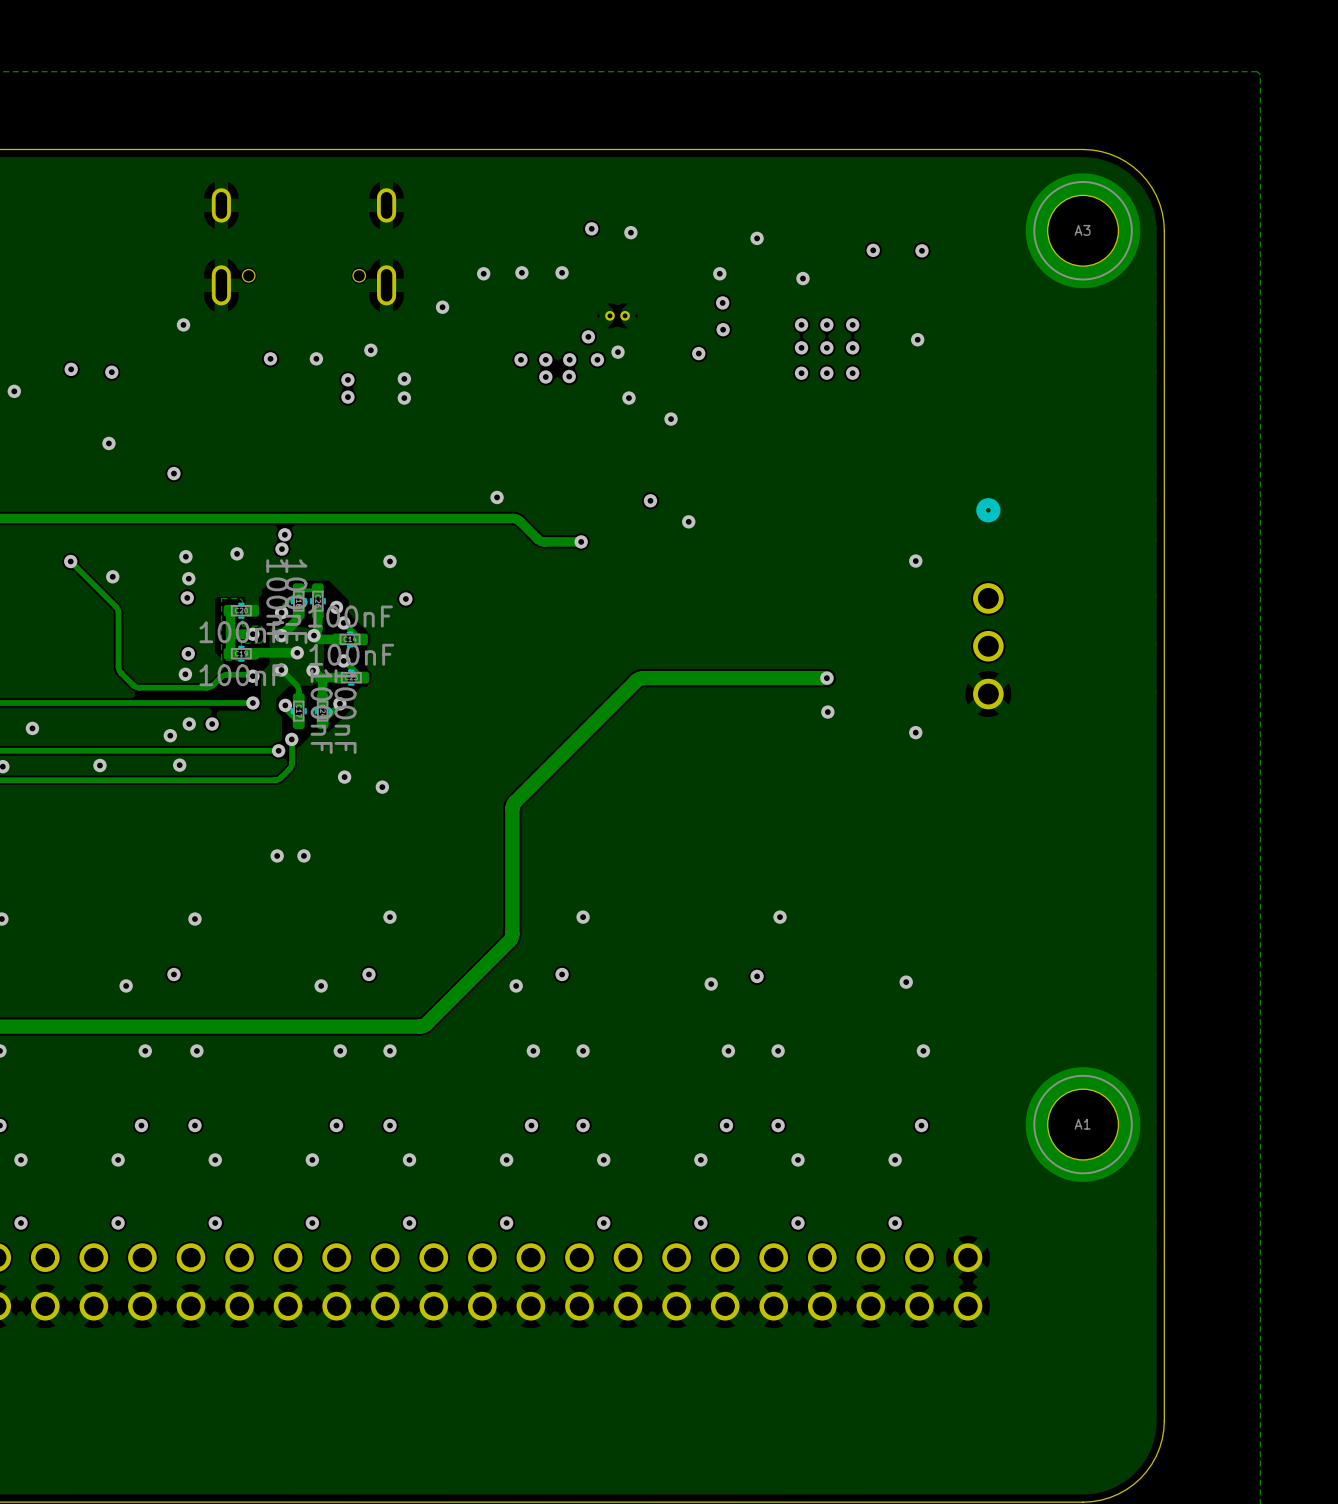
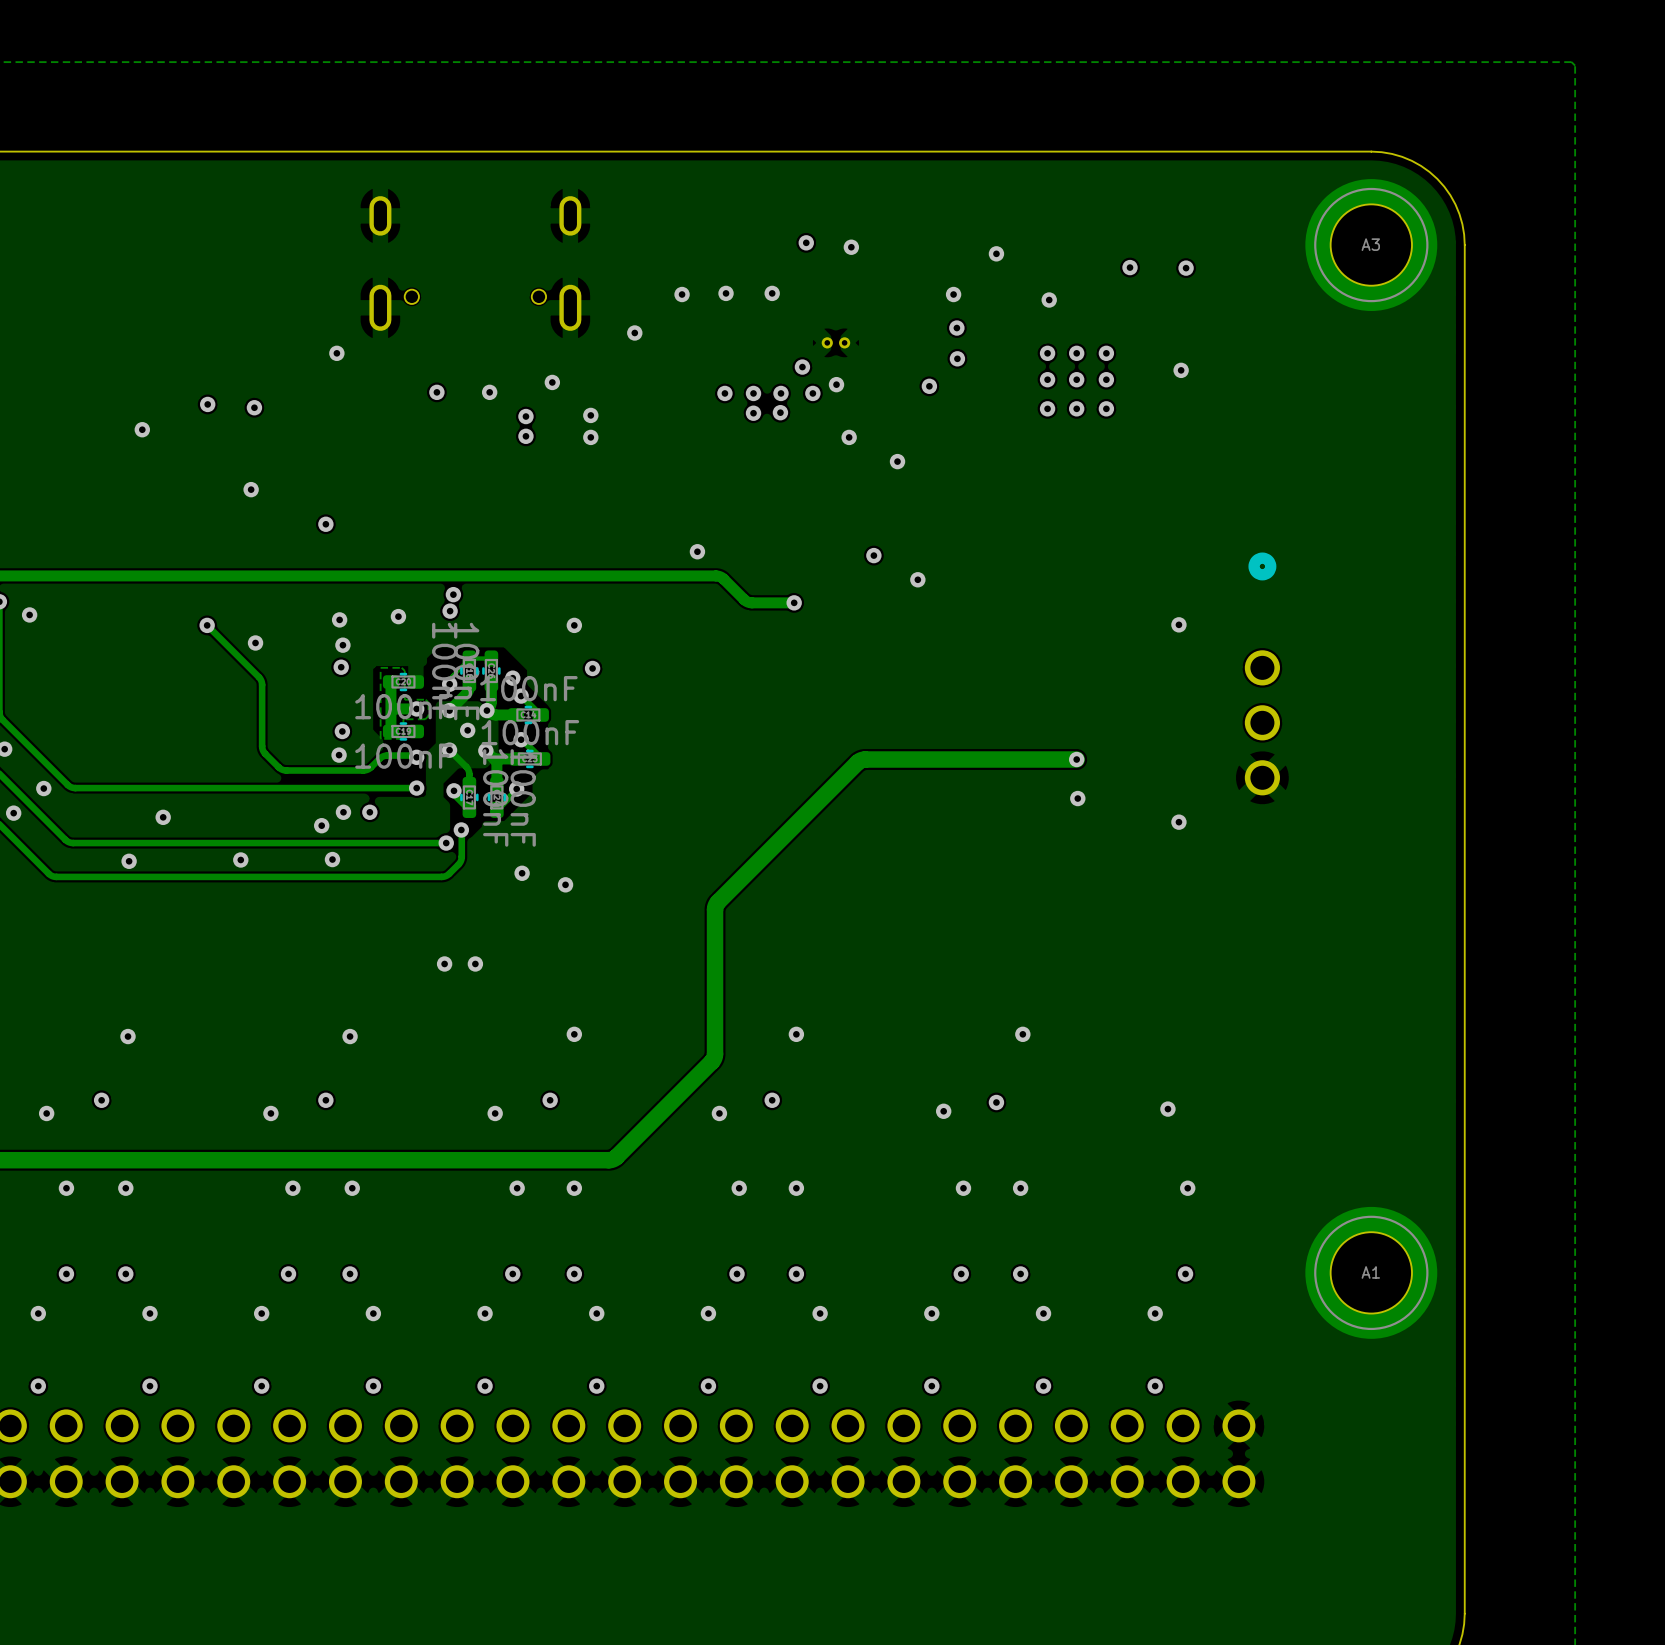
track: (297, 652) (252, 653) -> none

